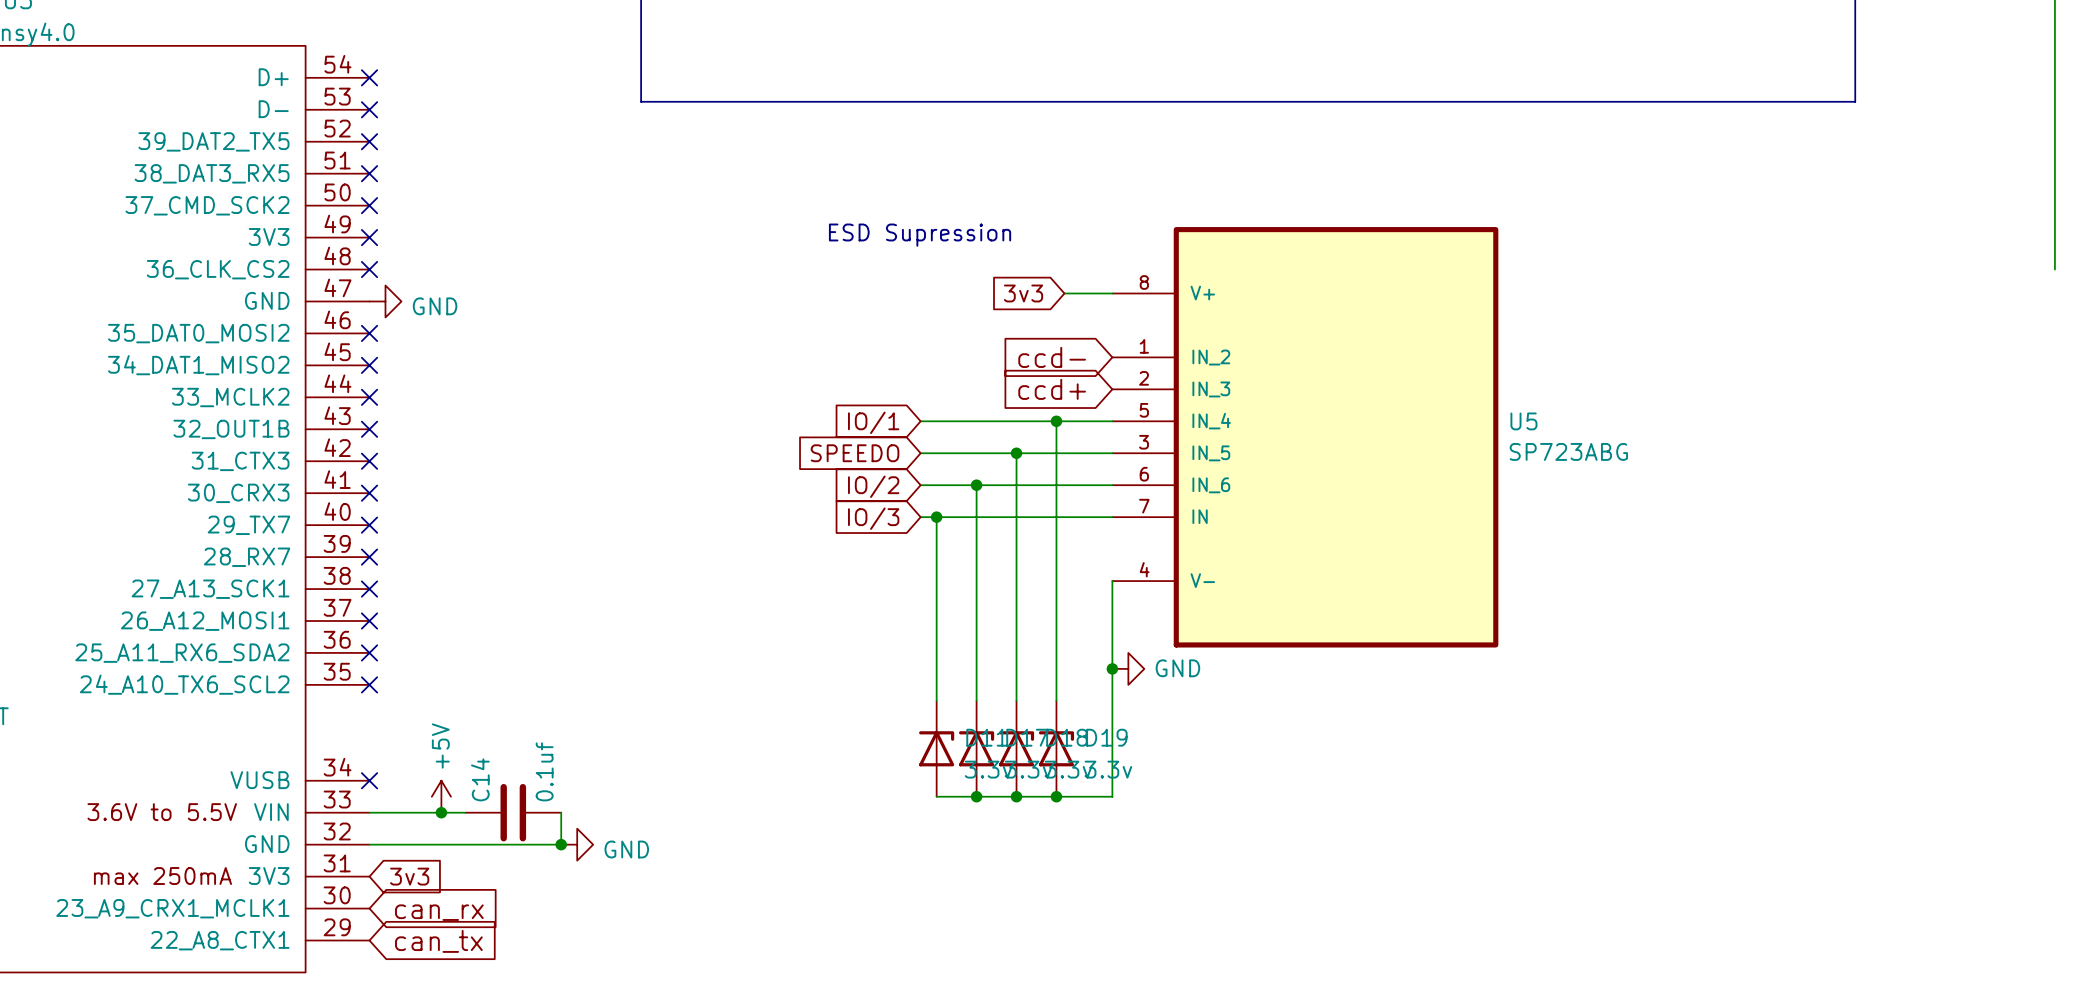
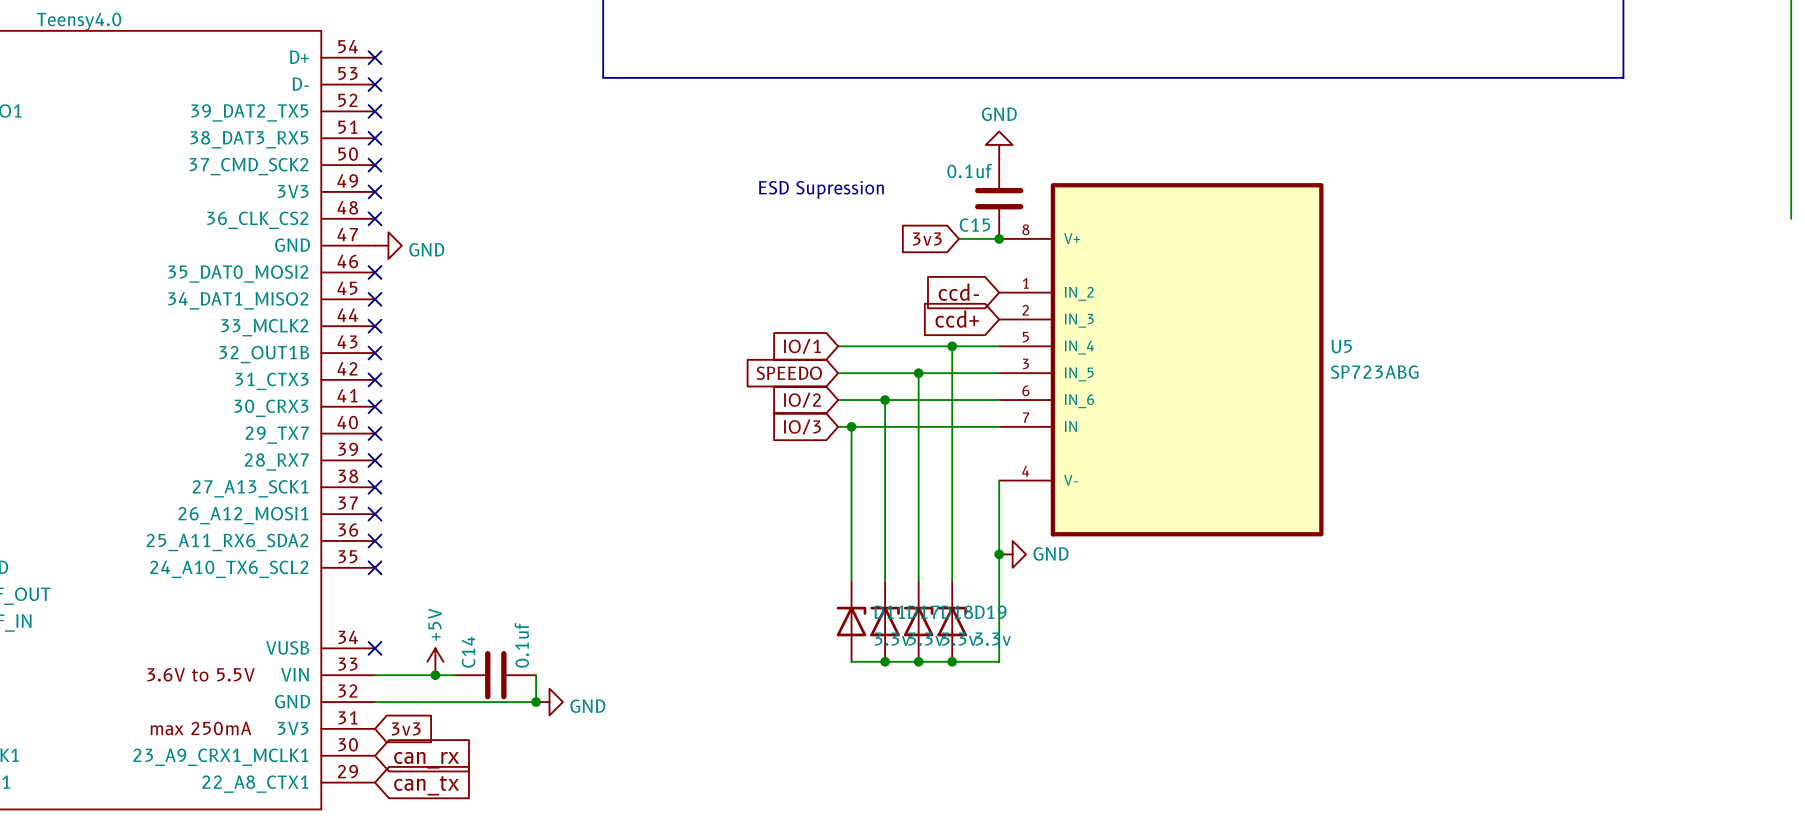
power symbol: none -> GND (999, 144)
C15: none -> 0.1uf (999, 198)
junction: none -> (999, 238)

